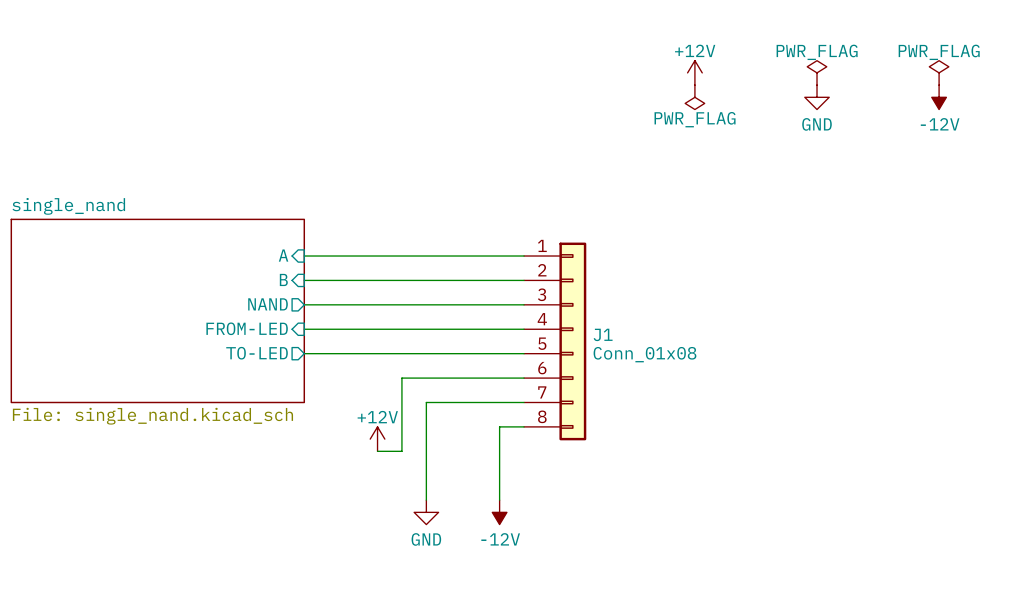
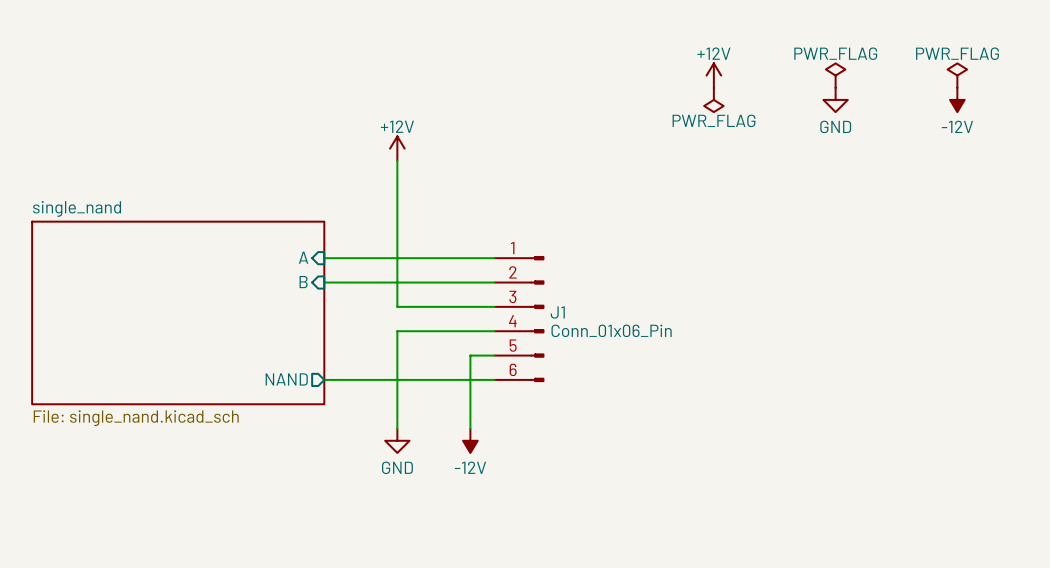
power symbol: none -> +12V (397, 148)
J1 symbol: [524, 242, 587, 441] -> [494, 256, 545, 382]
sheet pin position: NAND (268, 304) -> NAND (286, 379)
wire: (304, 304) (377, 304) -> (397, 160) (397, 306)
sheet pin: FROM-LED (247, 328) -> none
wire: (304, 329) (377, 329) -> (397, 428) (397, 331)
sheet pin: TO-LED (257, 353) -> none
wire: (304, 353) (450, 353) -> (470, 428) (470, 355)
J1 value: Conn_01x08 (644, 354) -> Conn_01x06_Pin (611, 330)
wire: (401, 378) (401, 451) (377, 451) -> (421, 379) (324, 379)
wire: (524, 402) (426, 402) (426, 500) -> none
wire: (524, 426) (499, 426) (499, 500) -> none
power symbol: +12V (377, 439) -> GND (397, 440)
power symbol: GND (426, 512) -> none
power symbol position: -12V (499, 512) -> -12V (470, 440)

